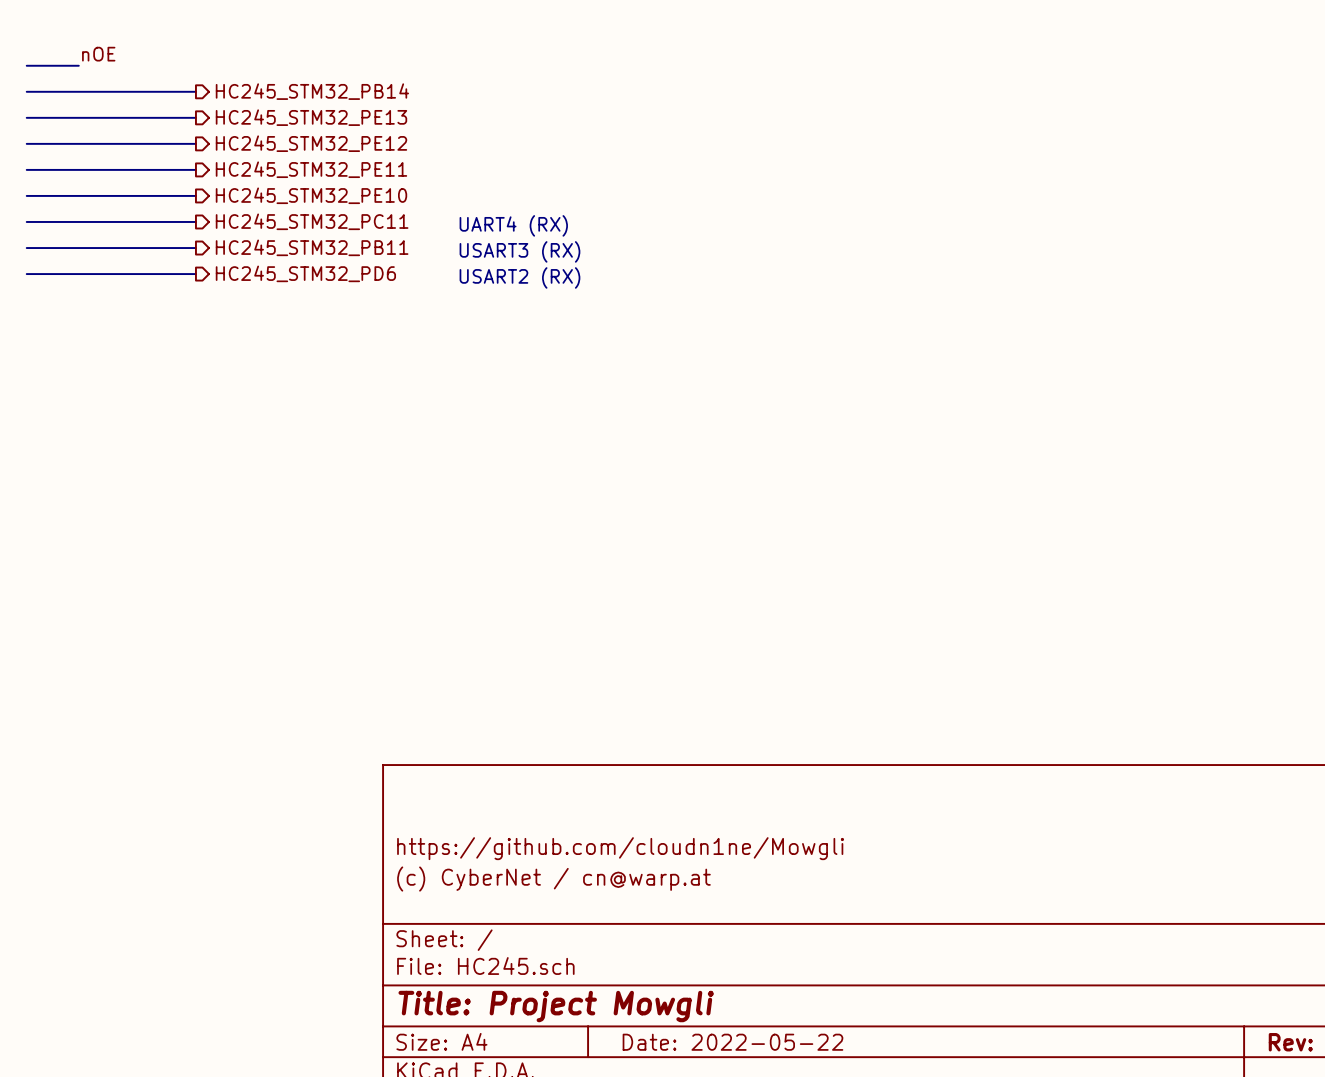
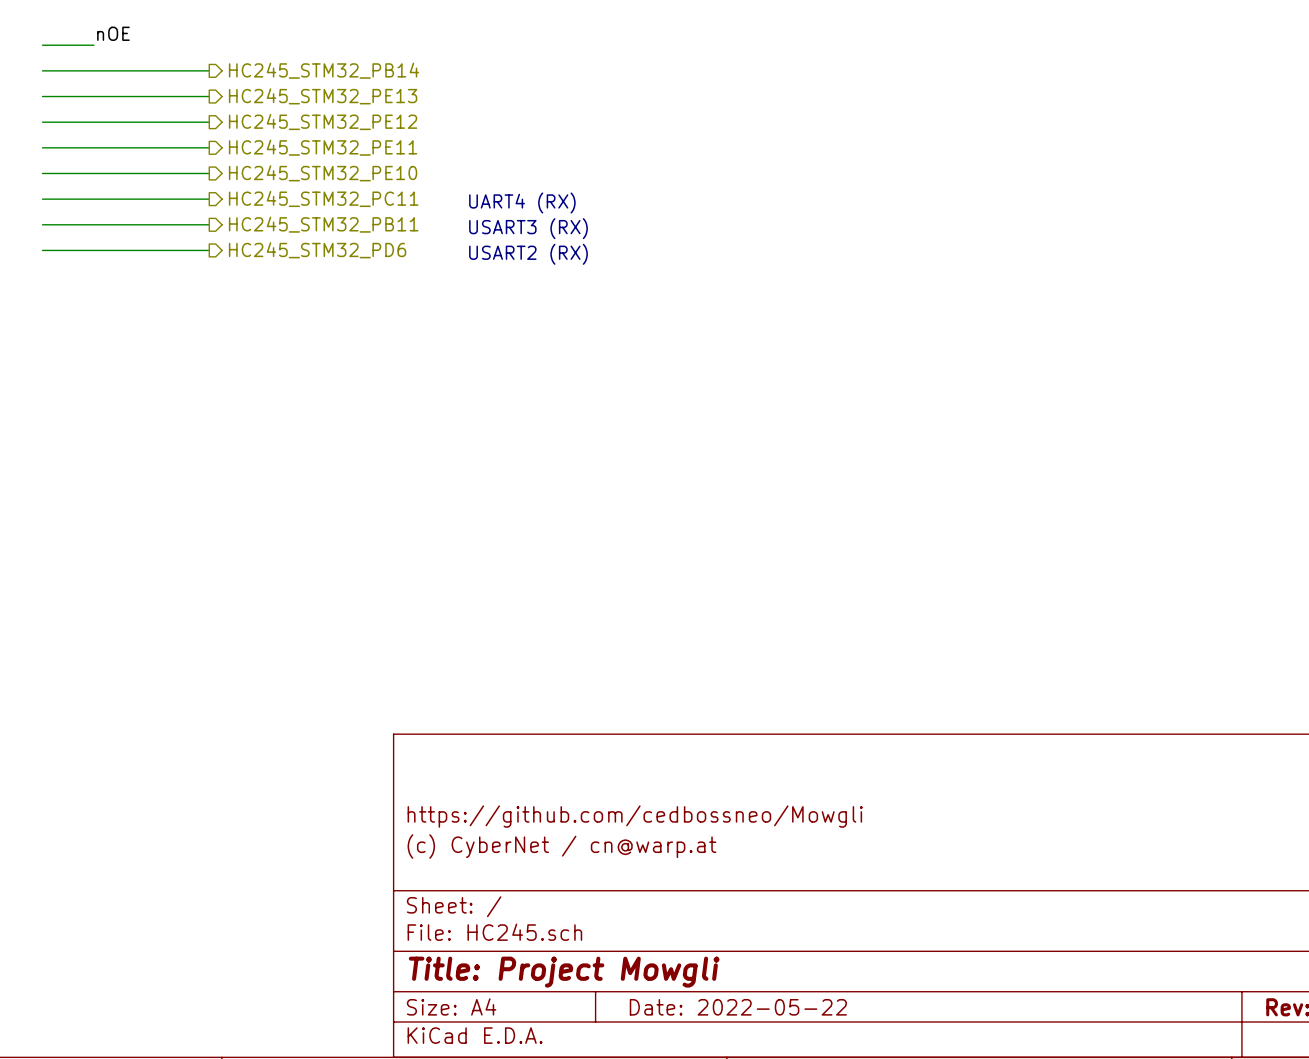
title block: https://github.com/cloudn1ne/Mowgli (620, 848) -> https://github.com/cedbossneo/Mowgli (635, 816)

